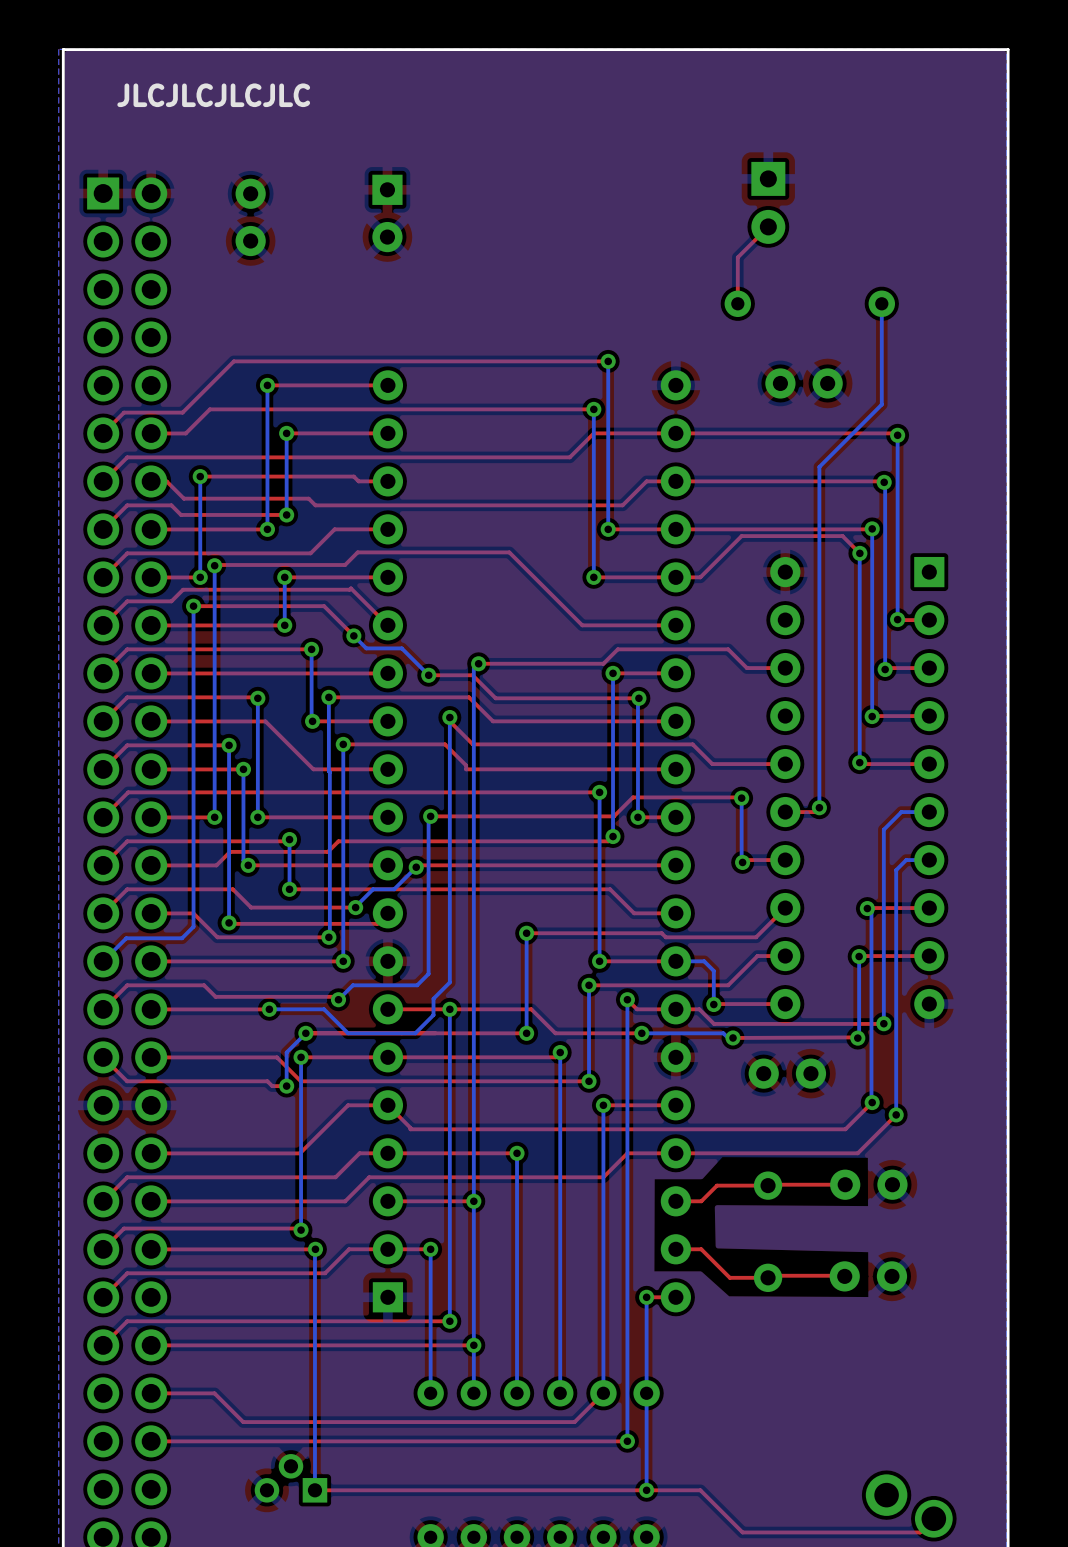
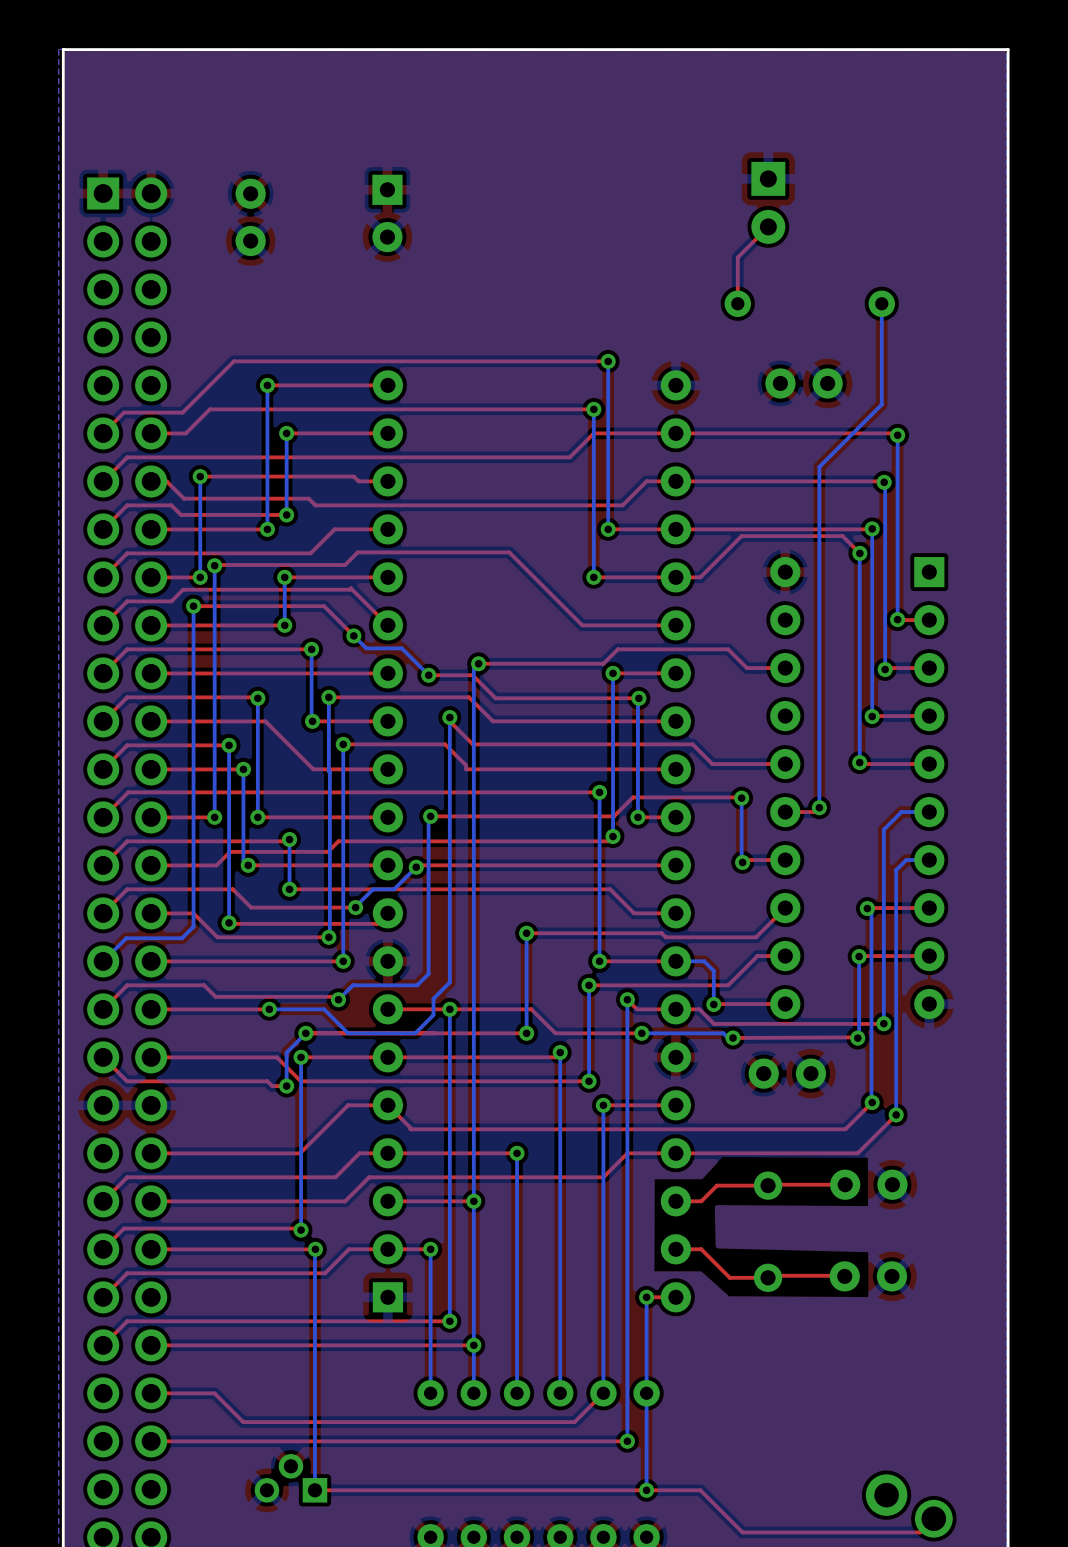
text: JLCJLCJLCJLC (213, 95) -> none

